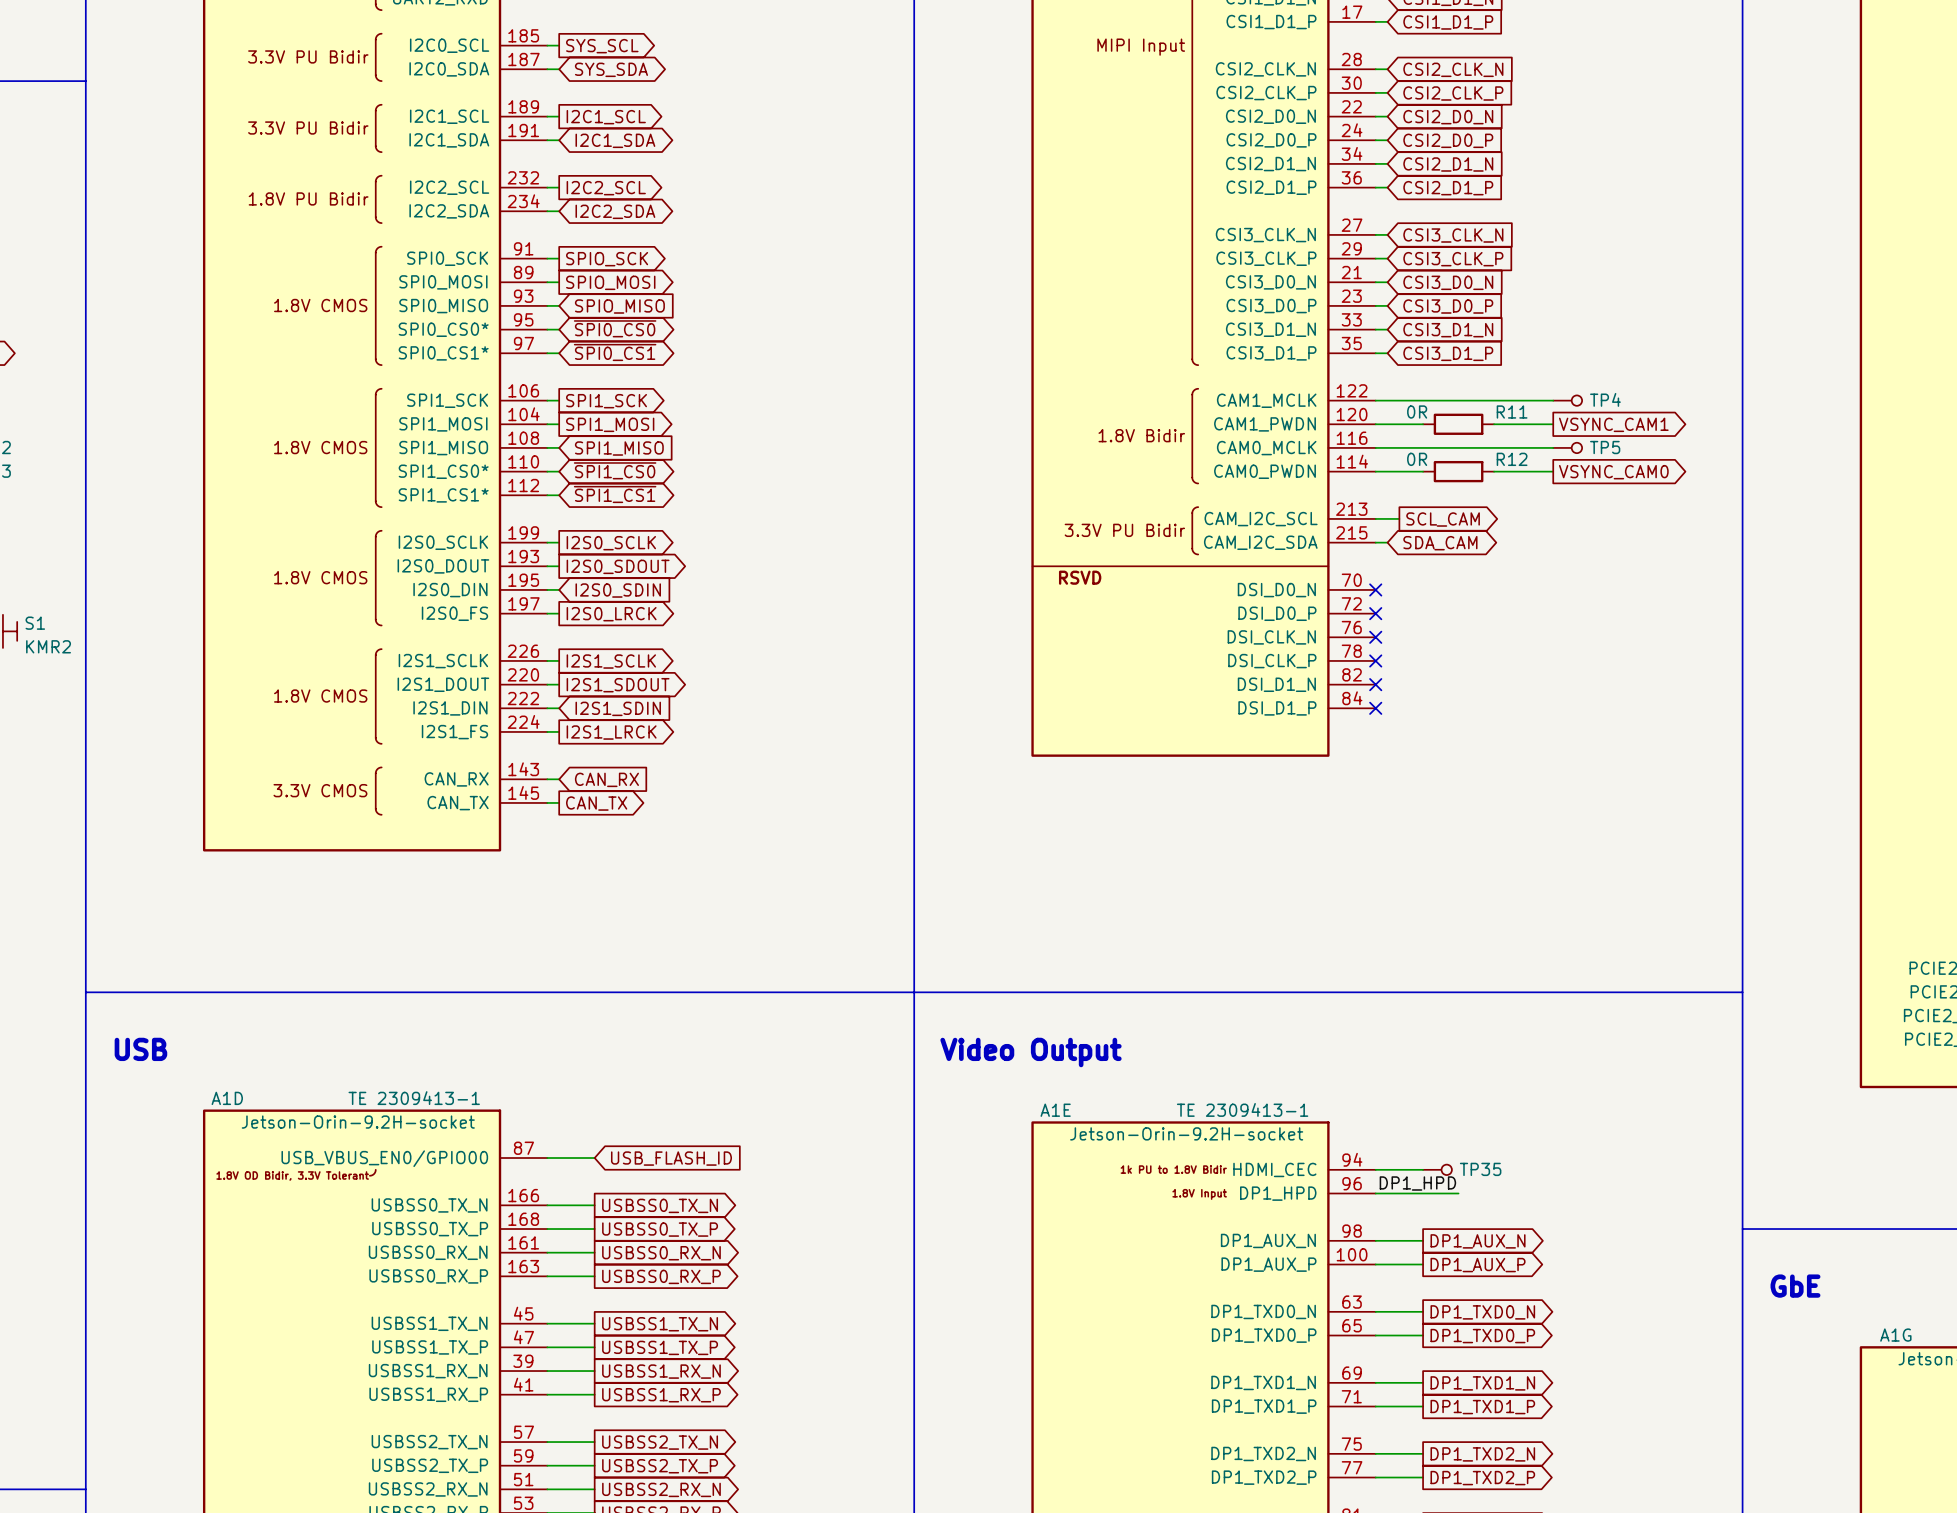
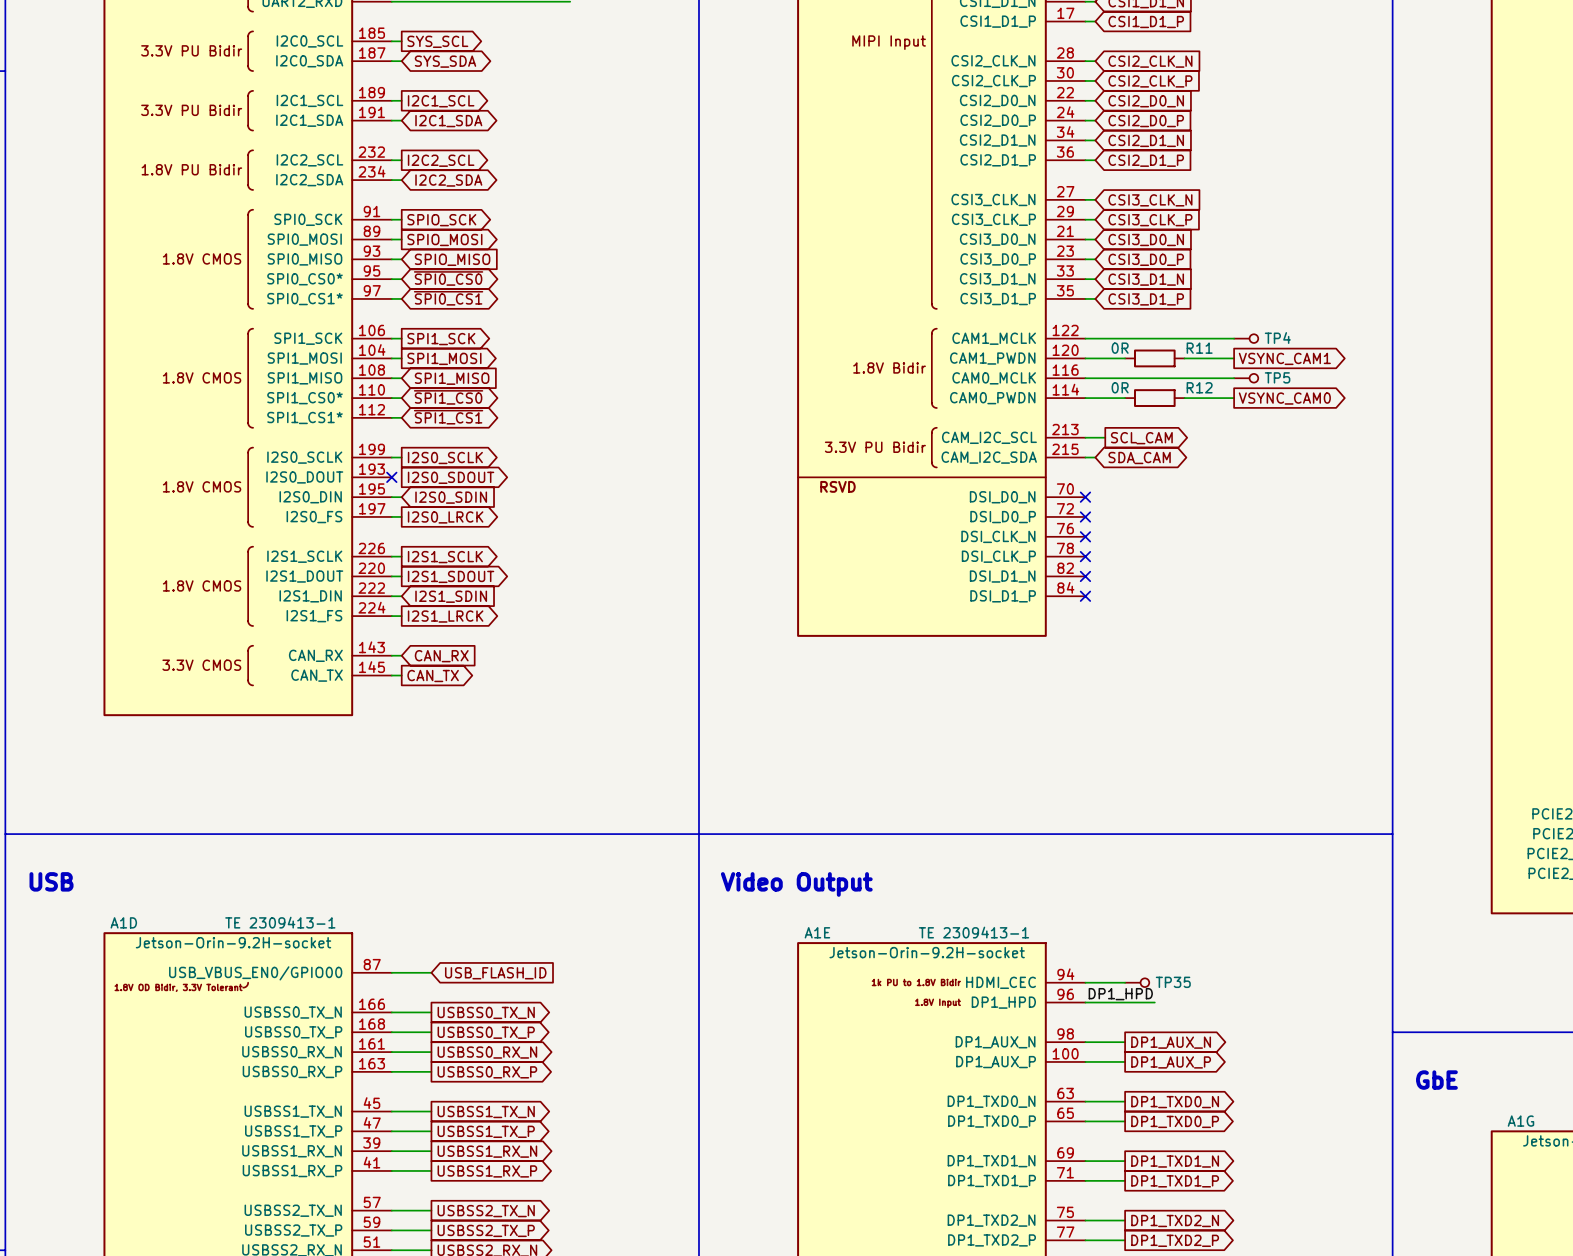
wire: (547, 566) (559, 566) -> none
no-connect mark: none -> (391, 477)

